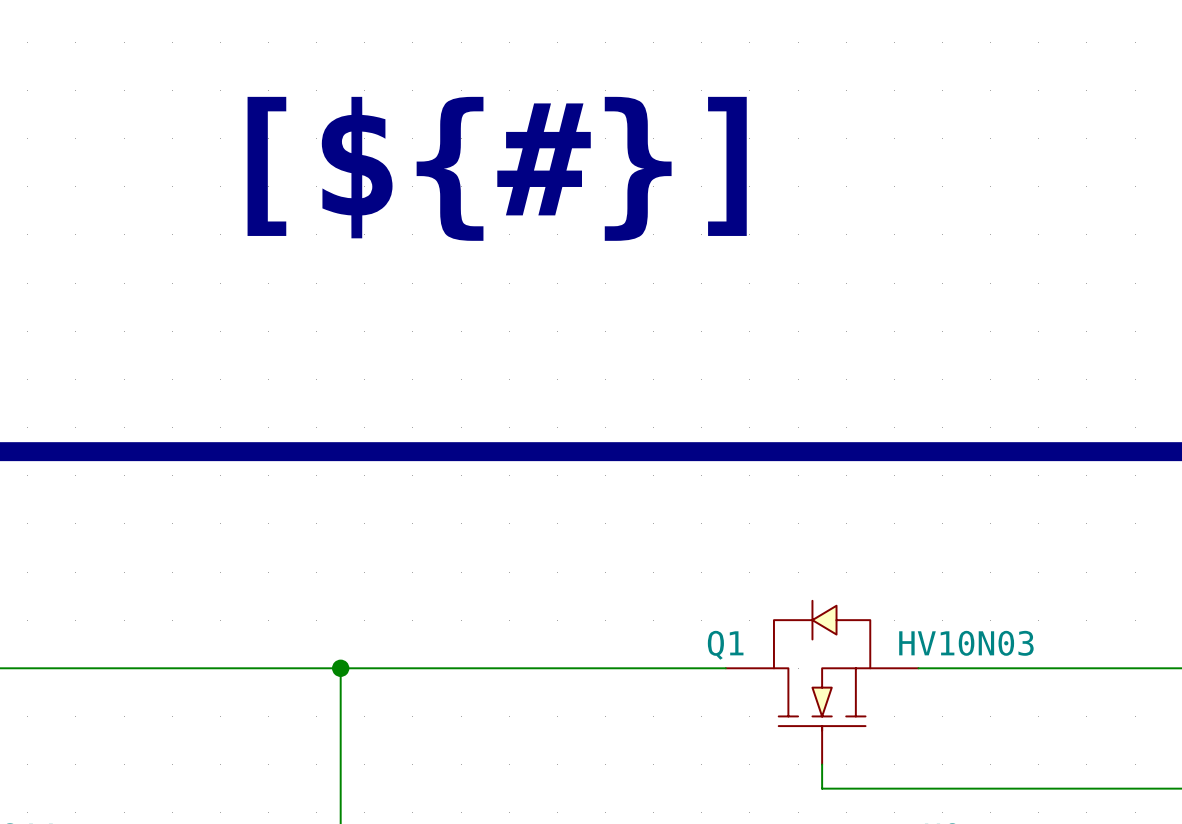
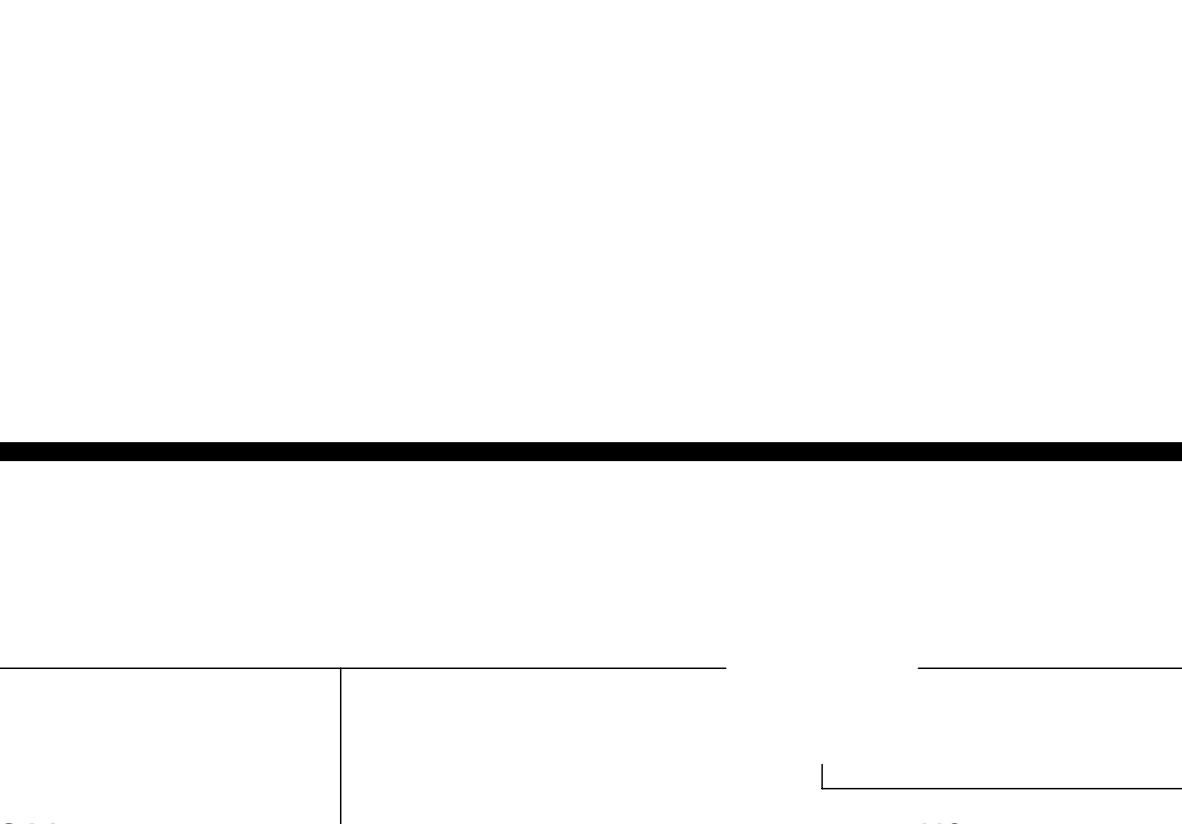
text: [${#}] (497, 168) -> none
junction: (340, 668) -> none
Q1: HV10N03 (822, 682) -> none

